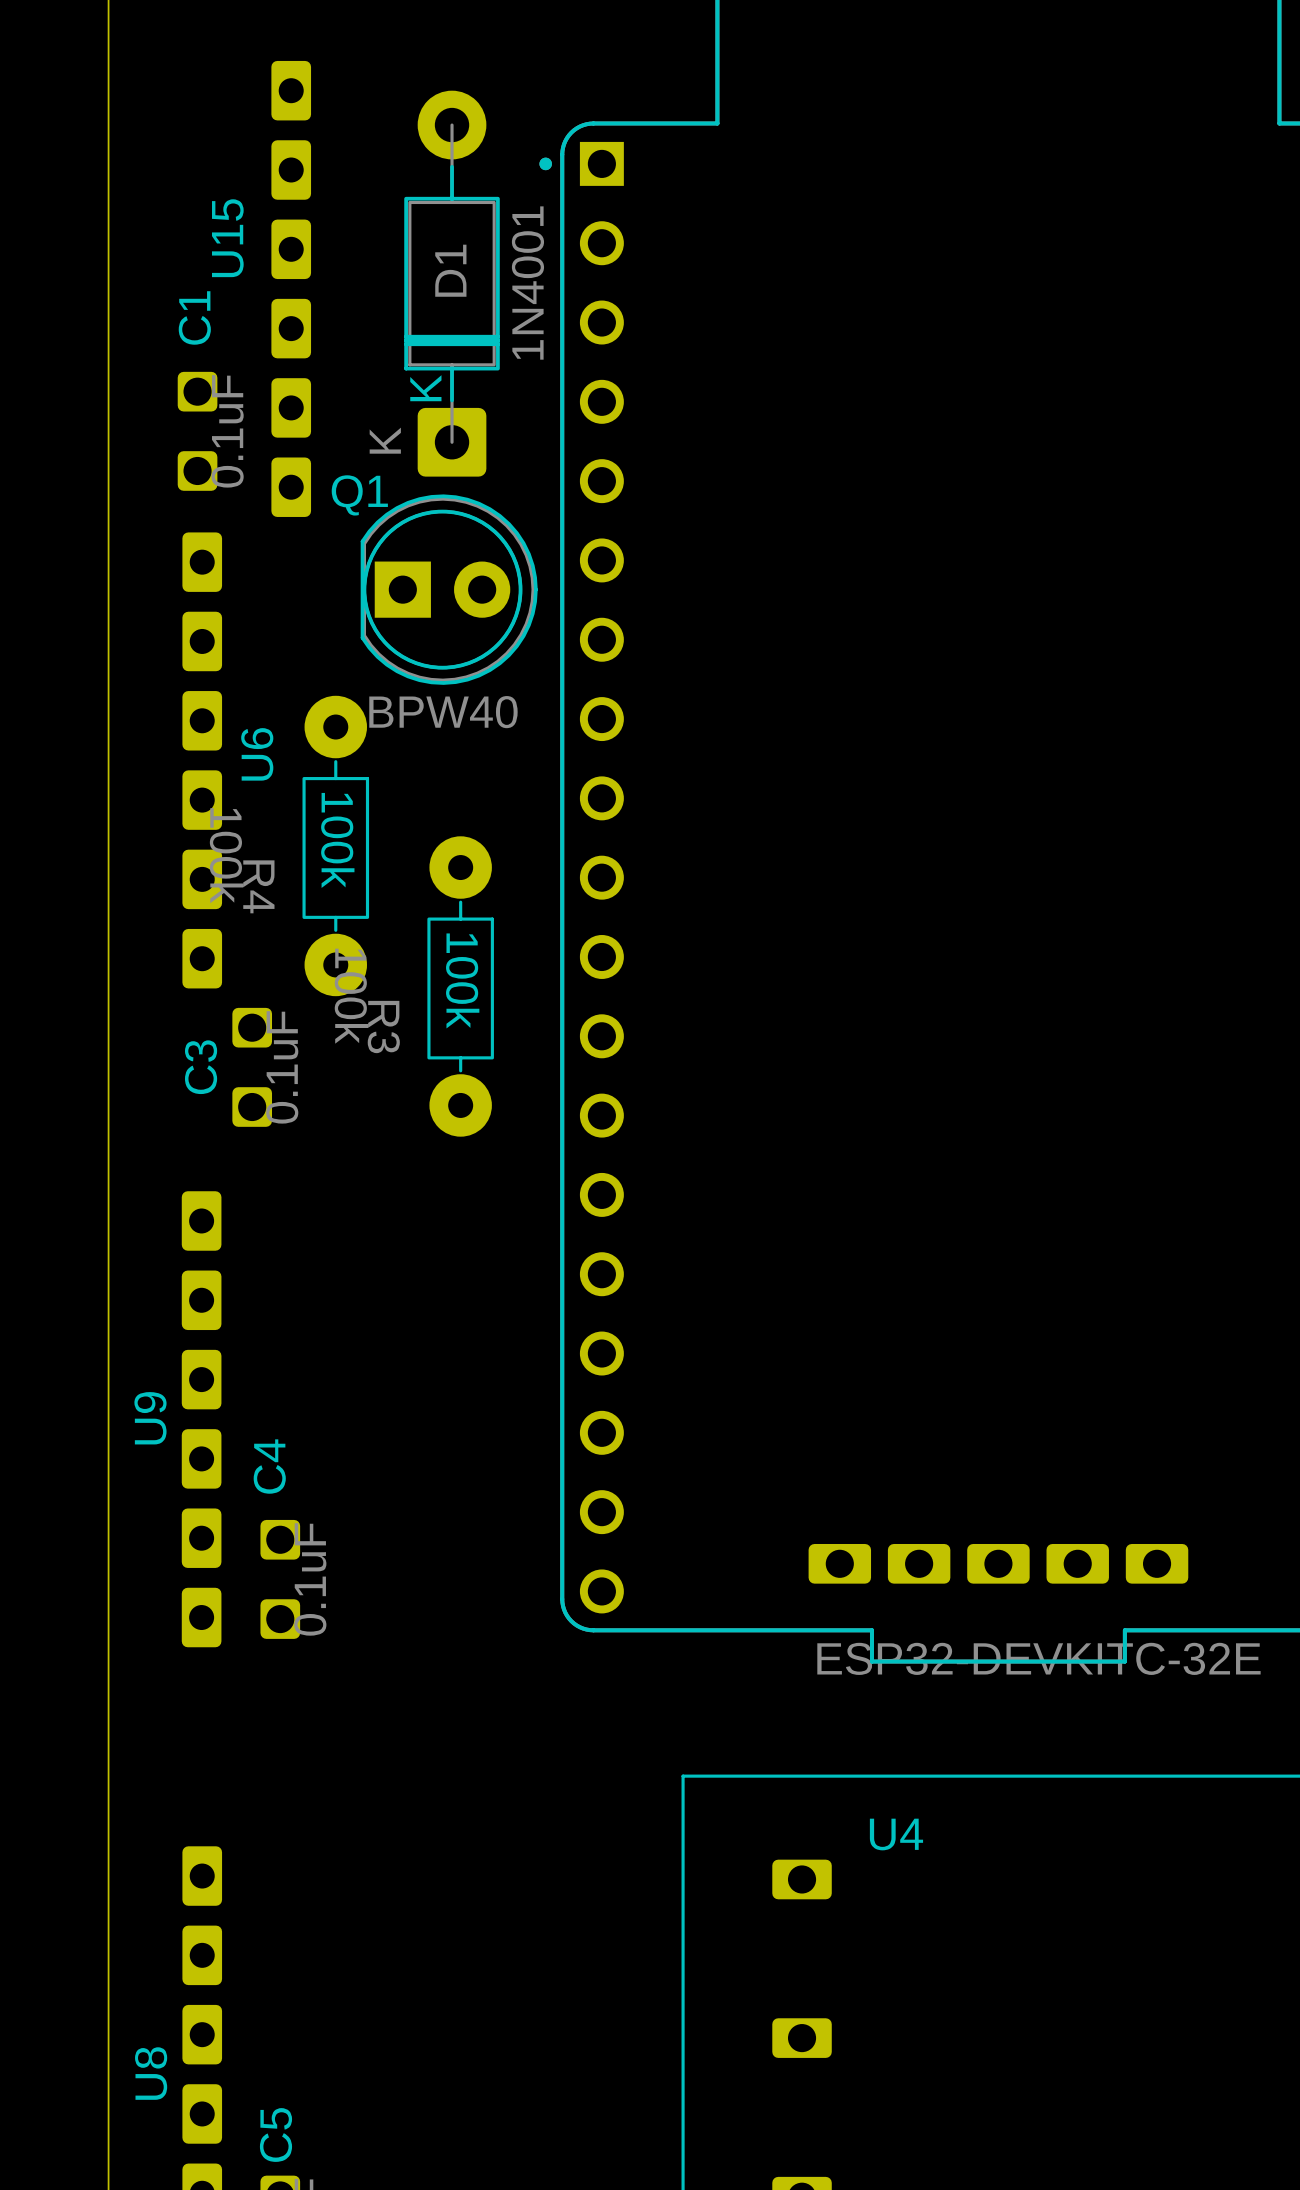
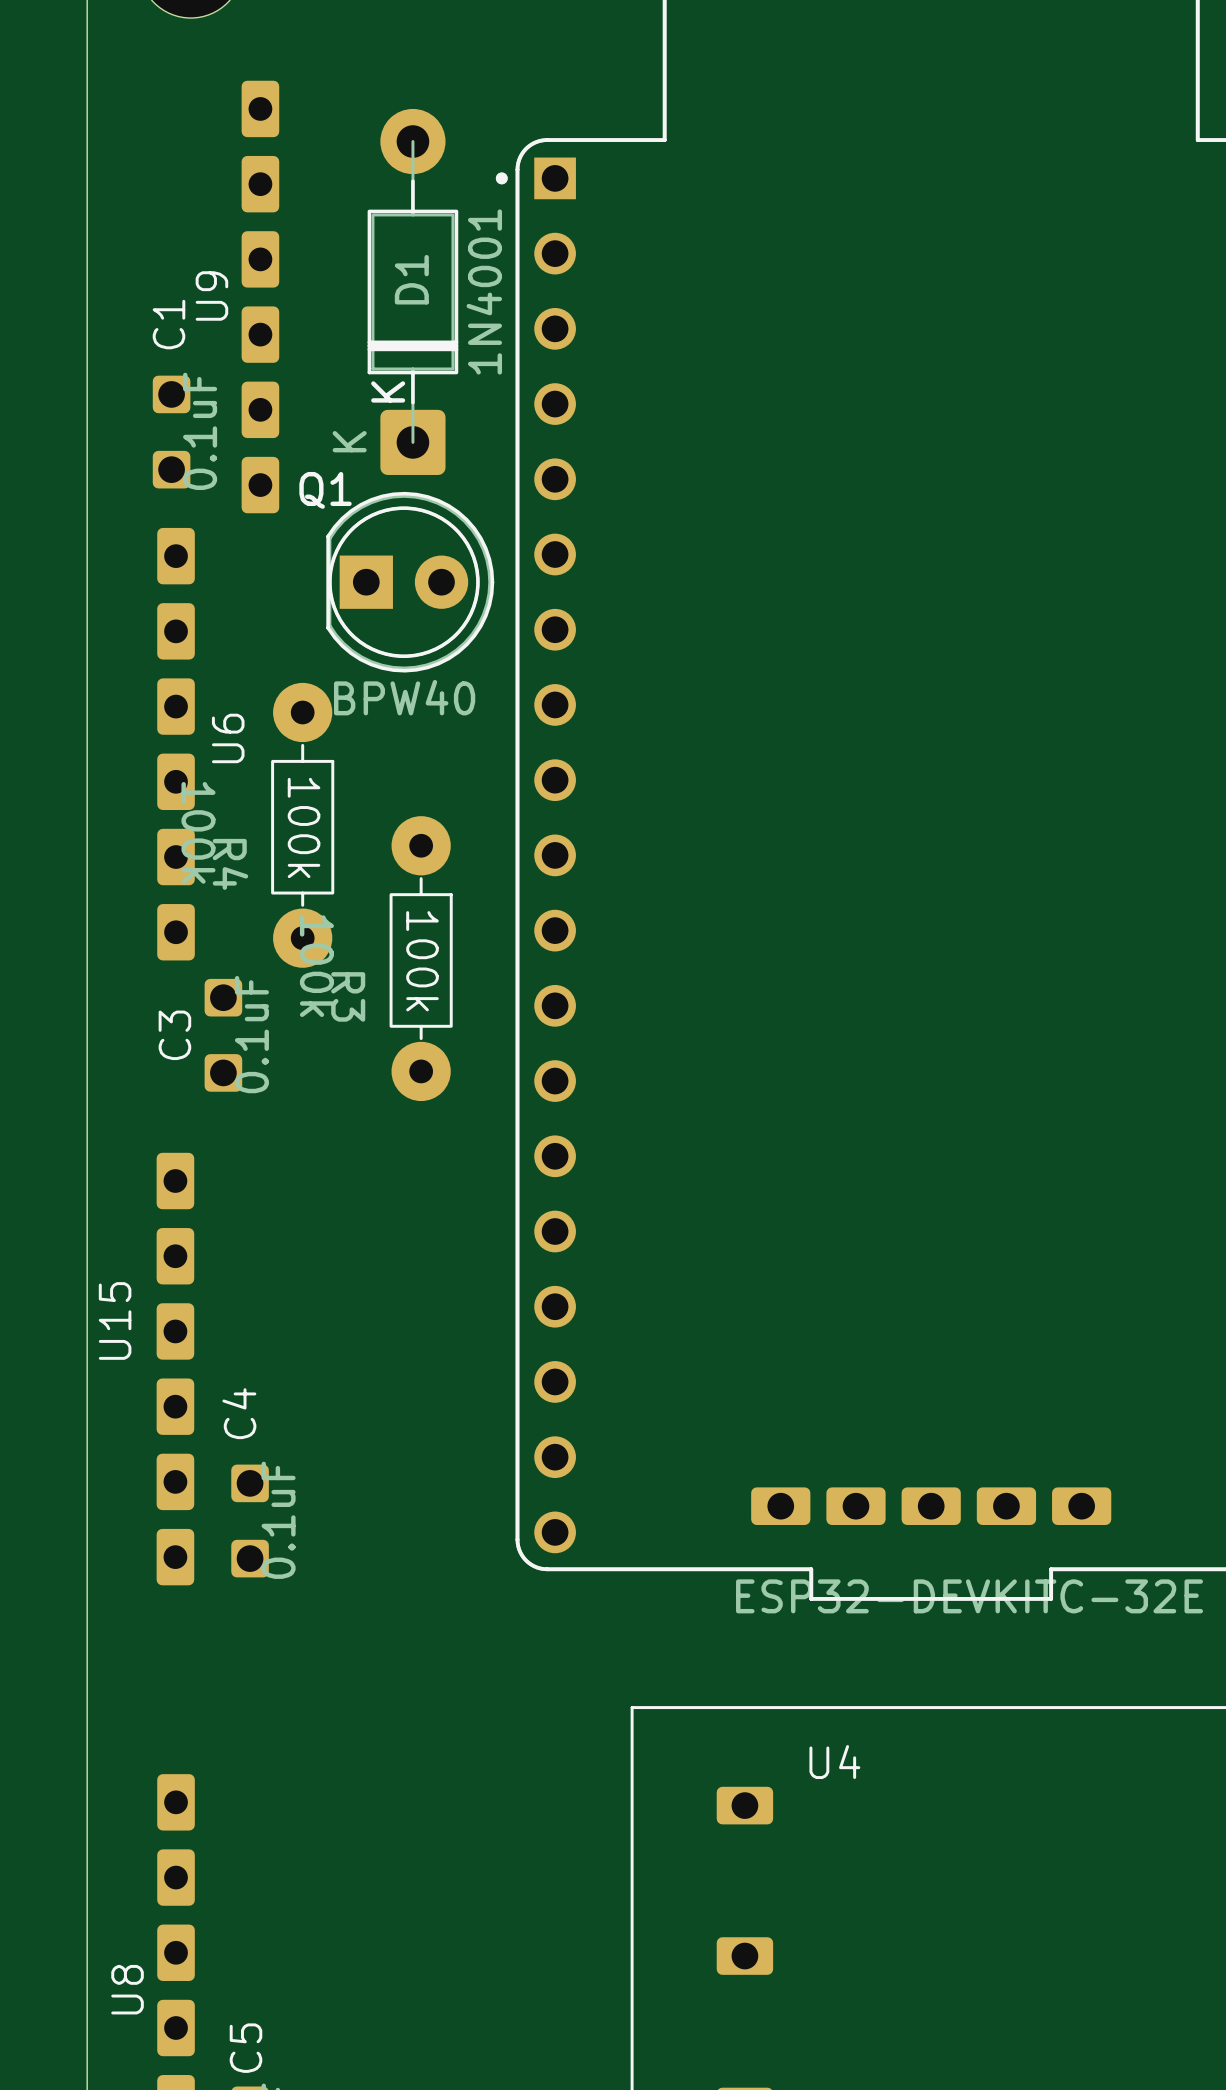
U15 name: U15 (227, 238) -> U9 (211, 296)
U9 name: U9 (150, 1418) -> U15 (115, 1320)

